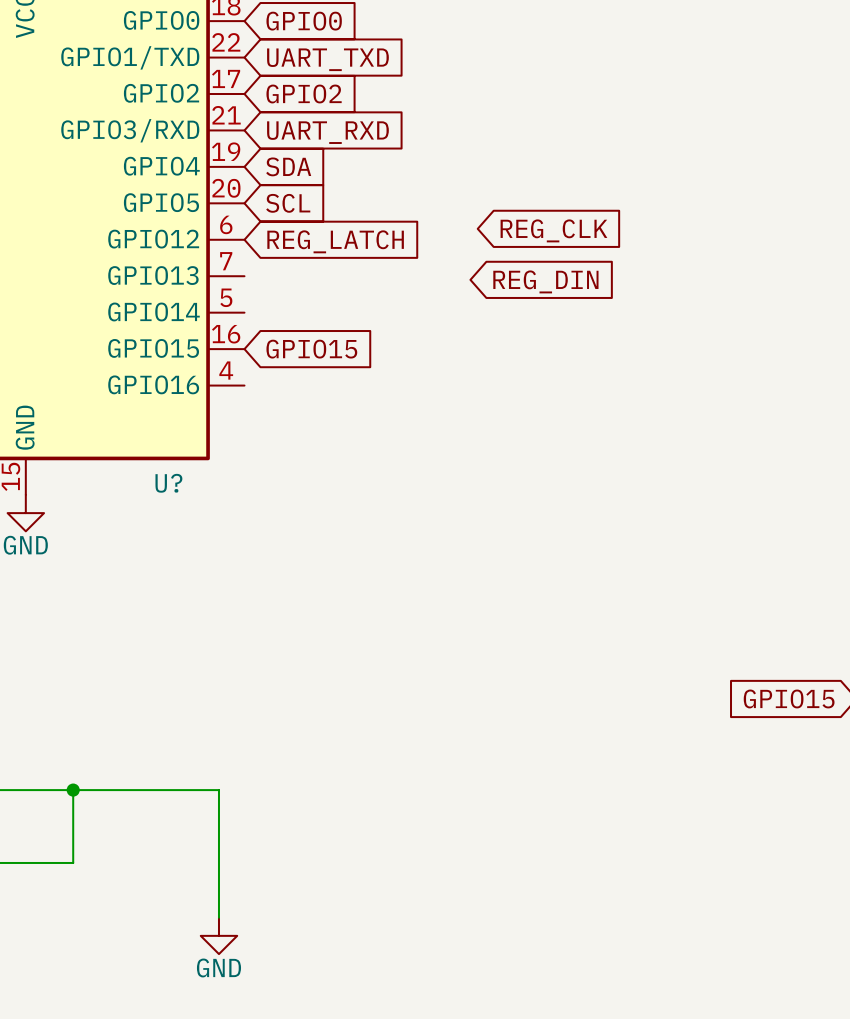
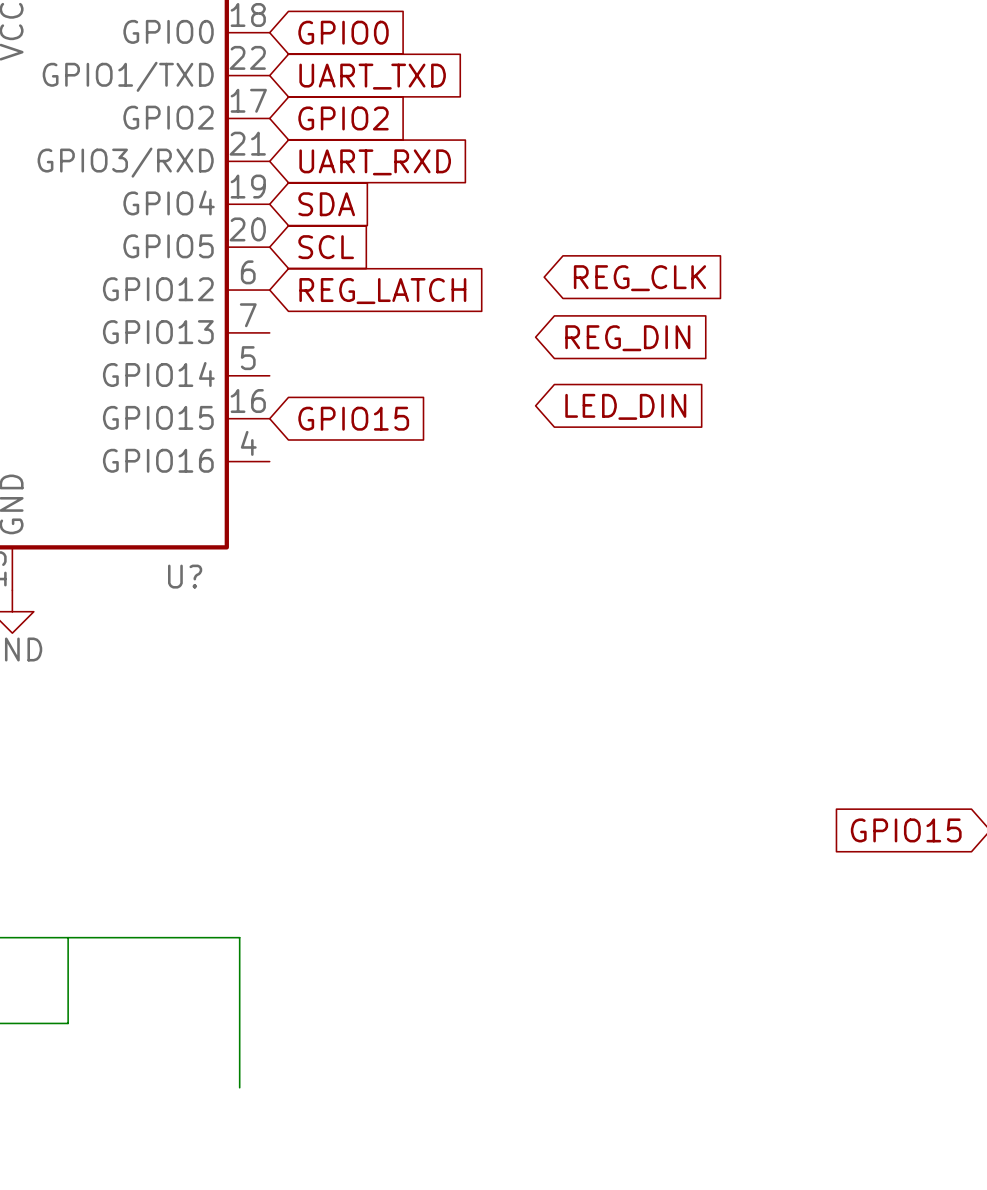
global label: none -> LED_DIN (625, 406)
junction: (73, 790) -> none
power symbol: GND (218, 935) -> none

